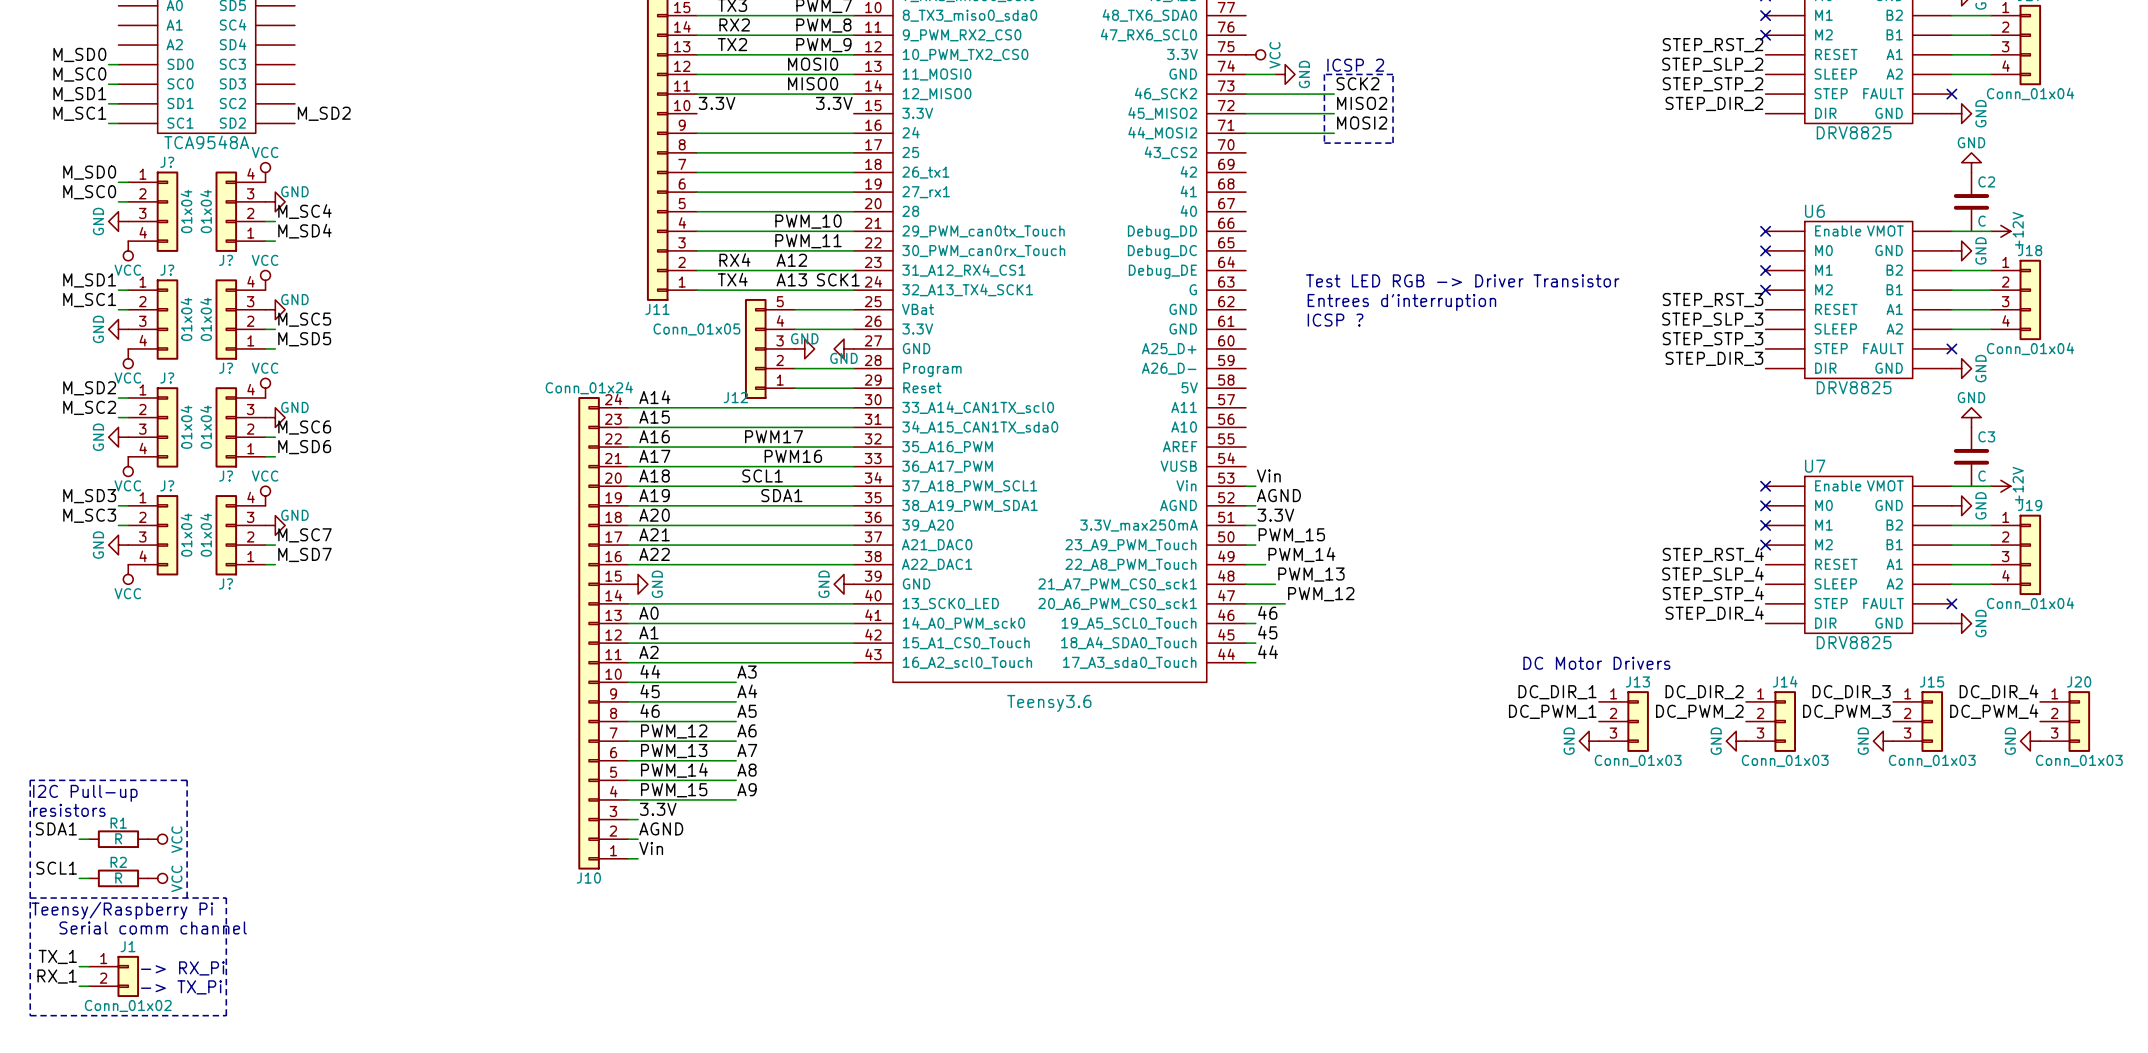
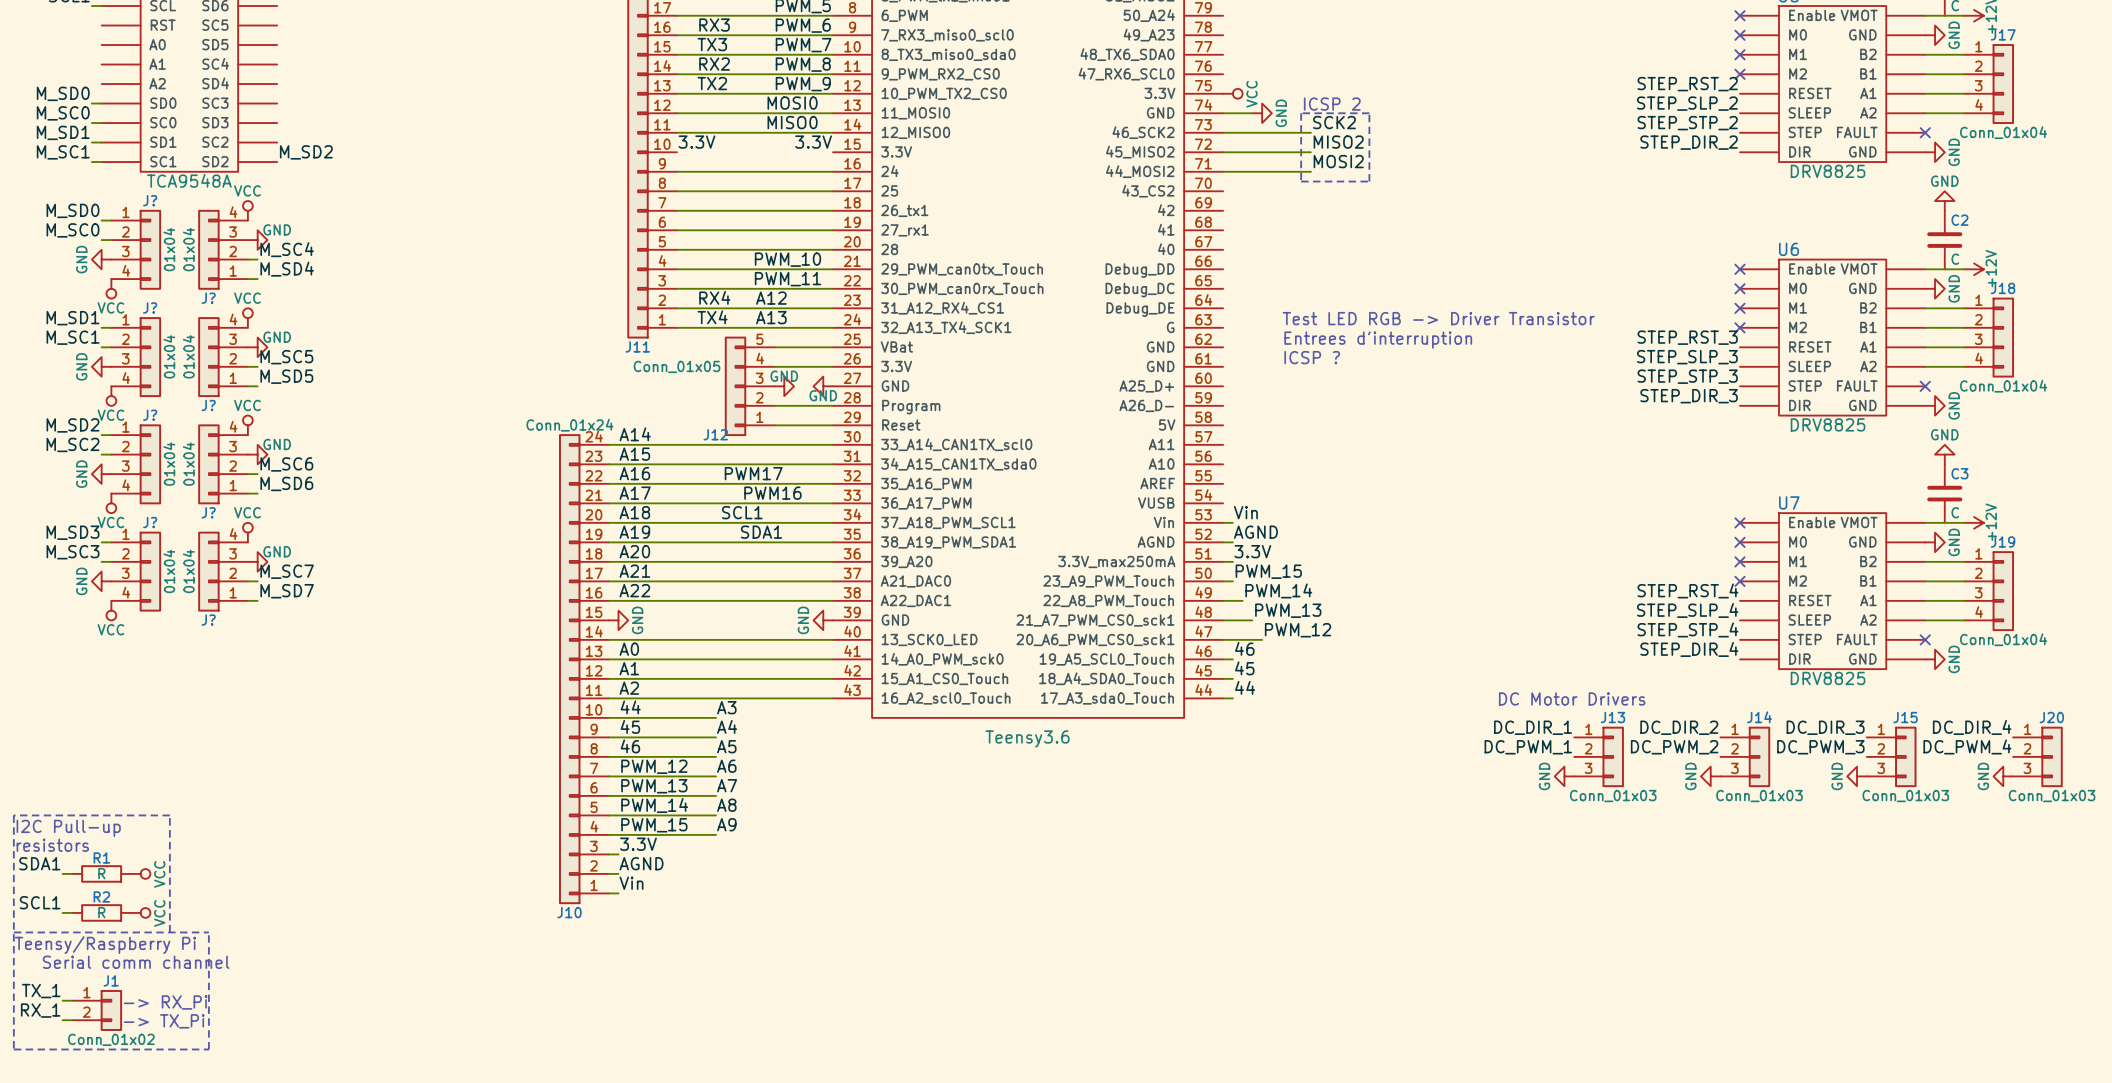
label: SCK1 (838, 279) -> none

